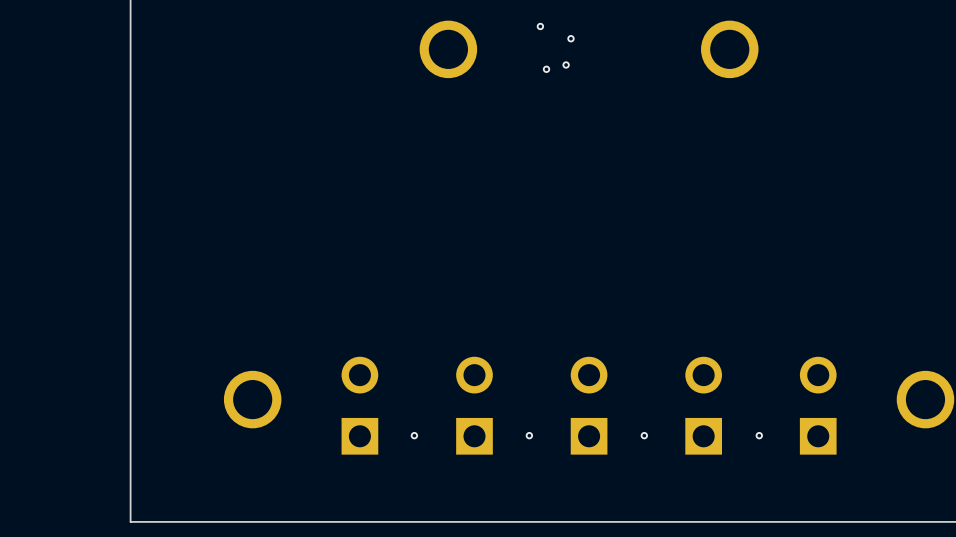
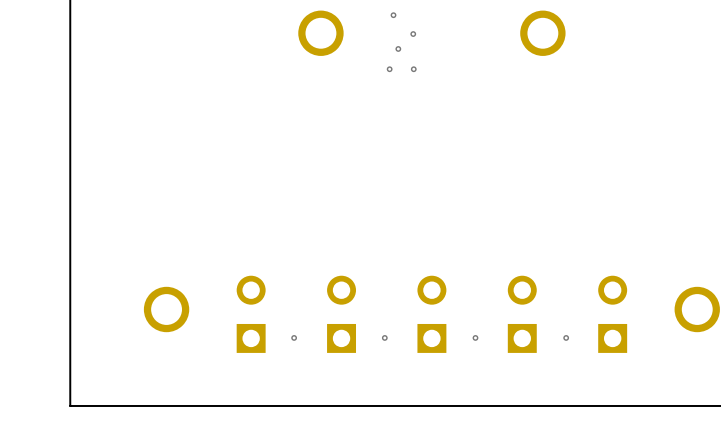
via: (570, 38) -> none
via: none -> (413, 34)
via: (566, 64) -> none
via: none -> (389, 69)
via: none -> (413, 69)

